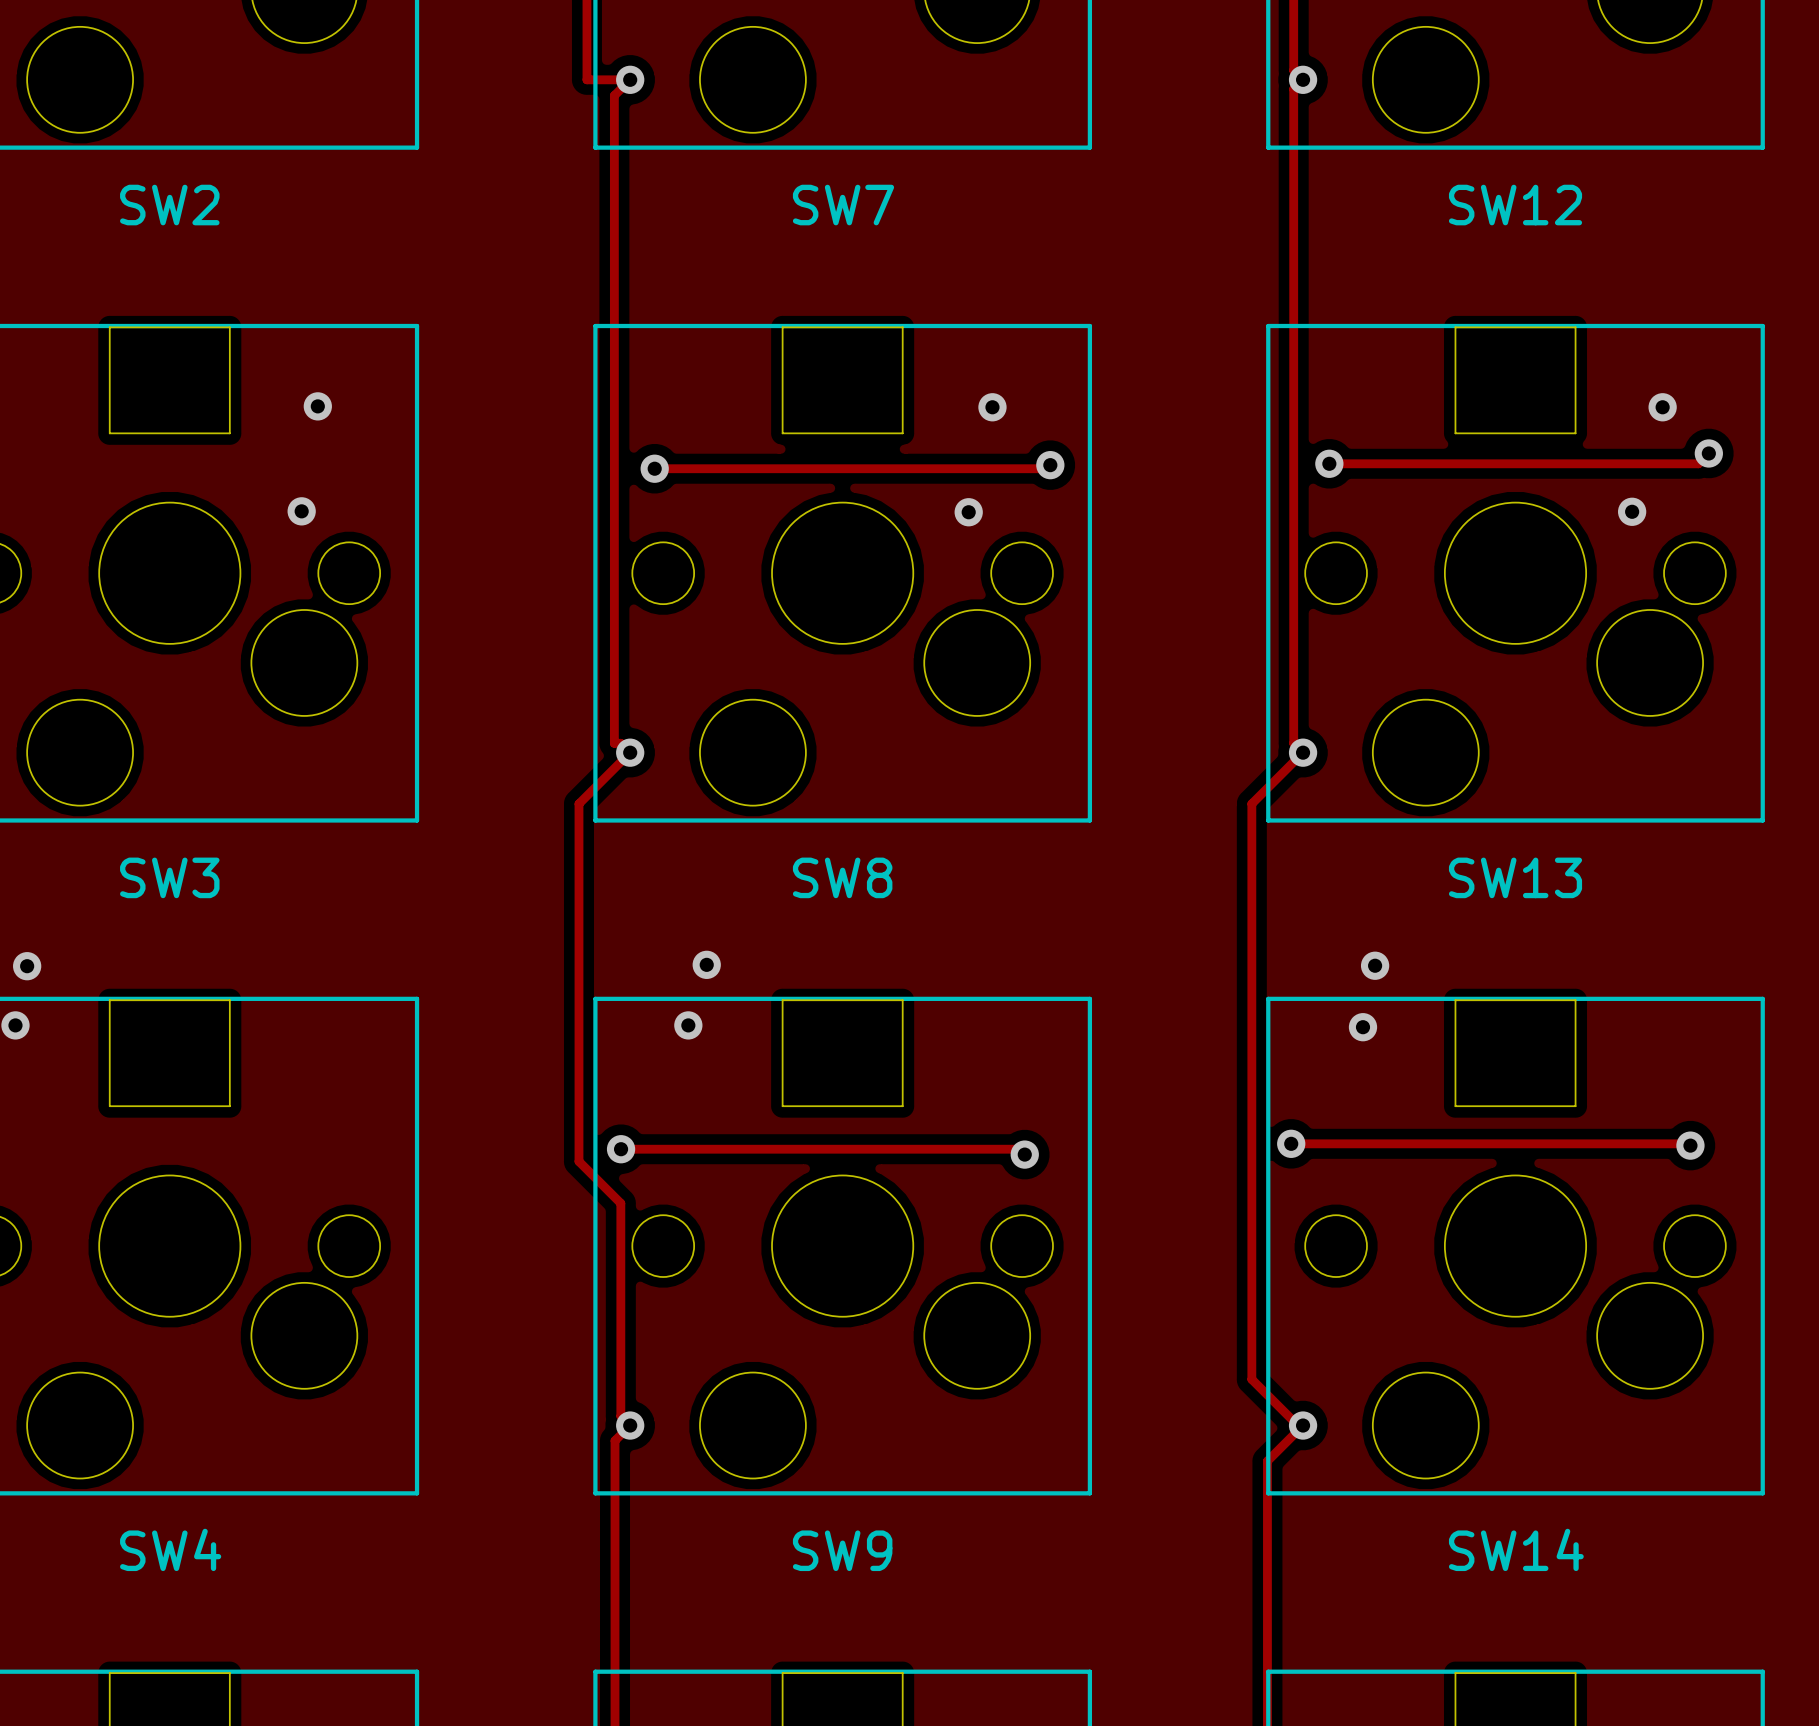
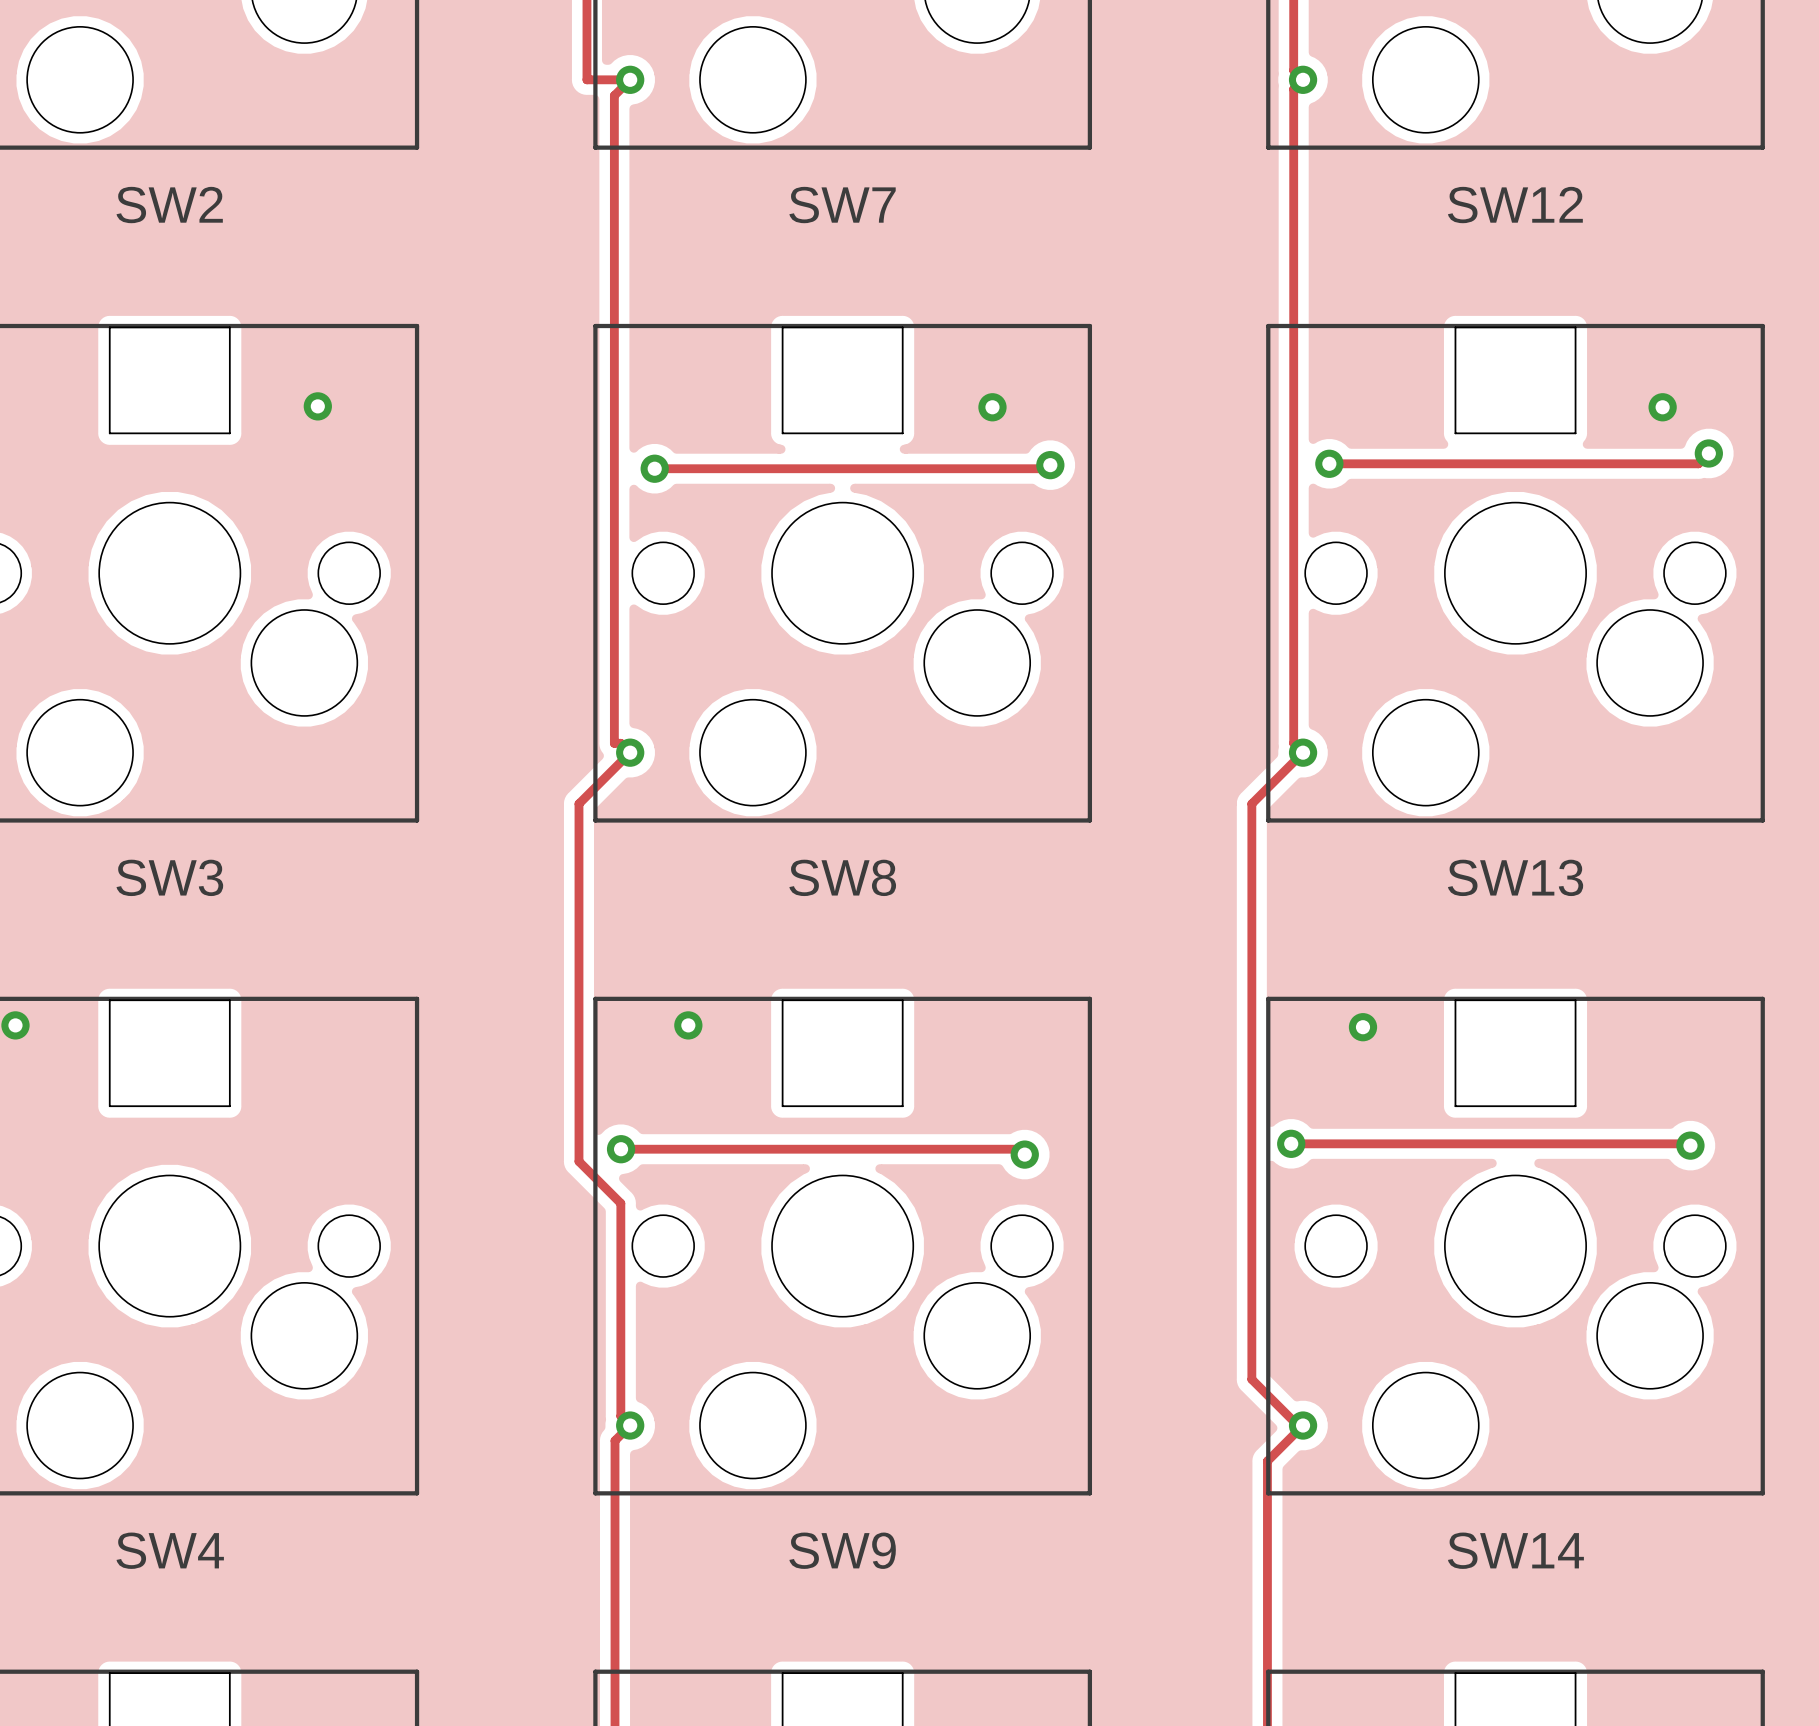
via: (301, 511) -> none
via: (1632, 511) -> none
via: (968, 512) -> none
via: (706, 964) -> none
via: (1375, 965) -> none
via: (27, 966) -> none

